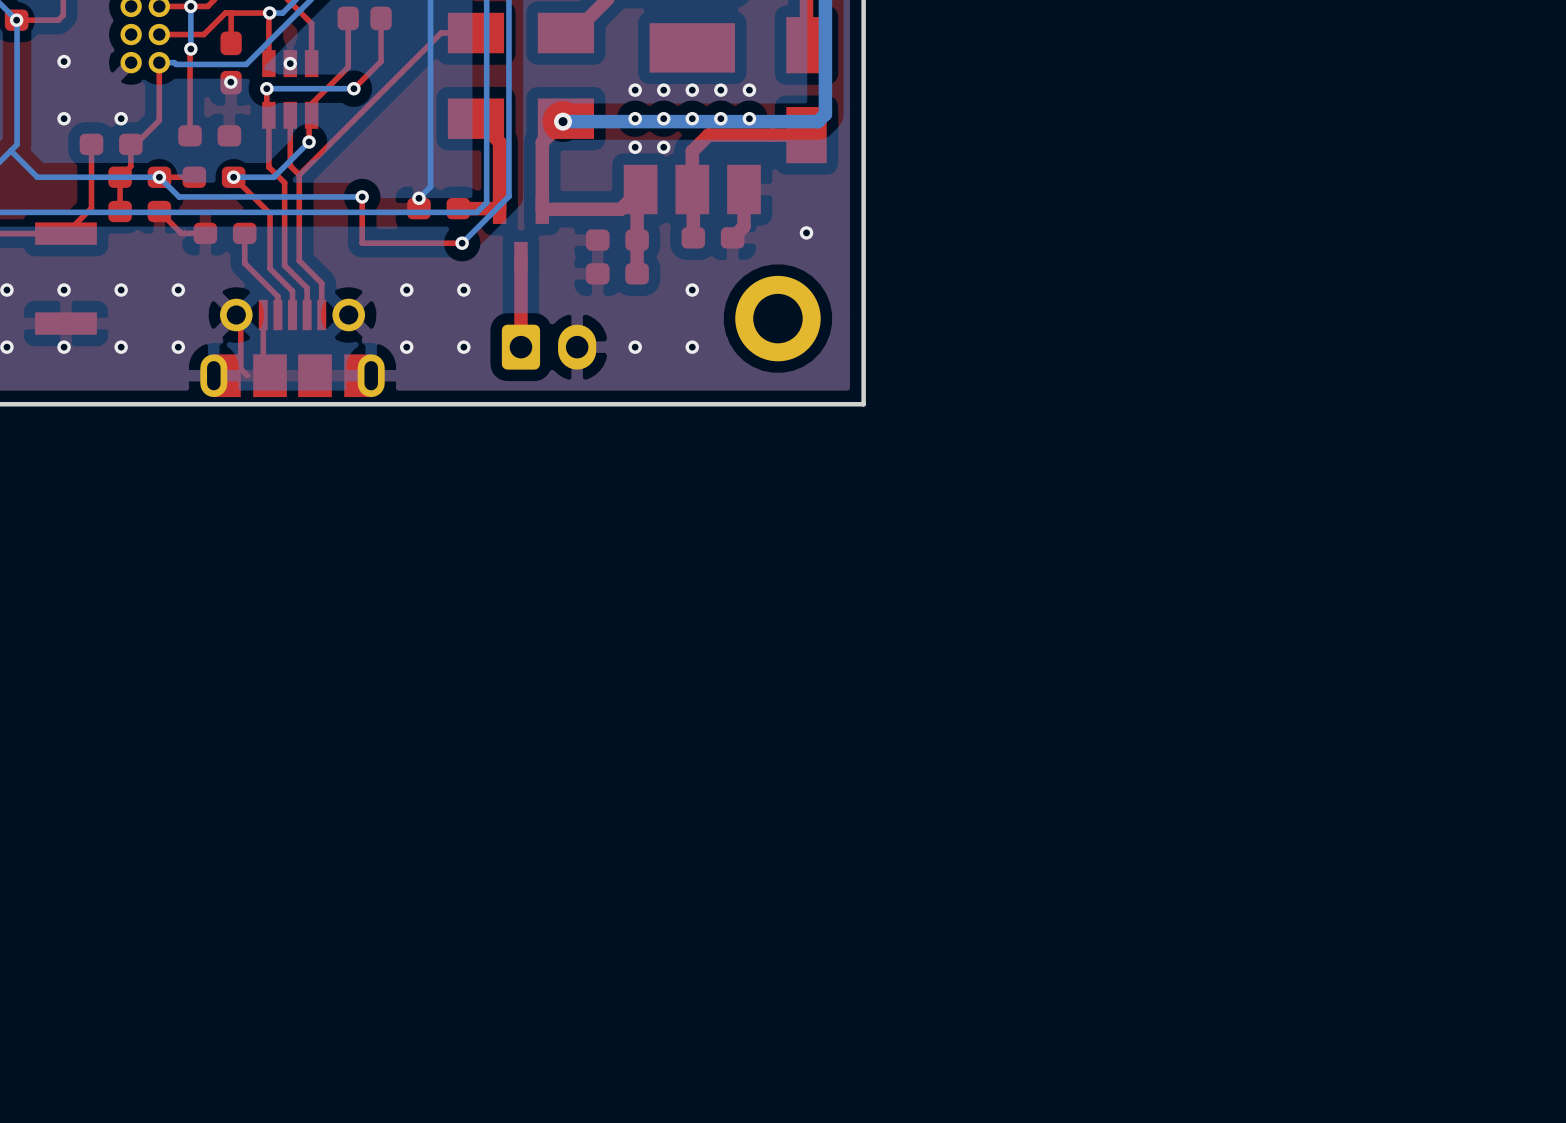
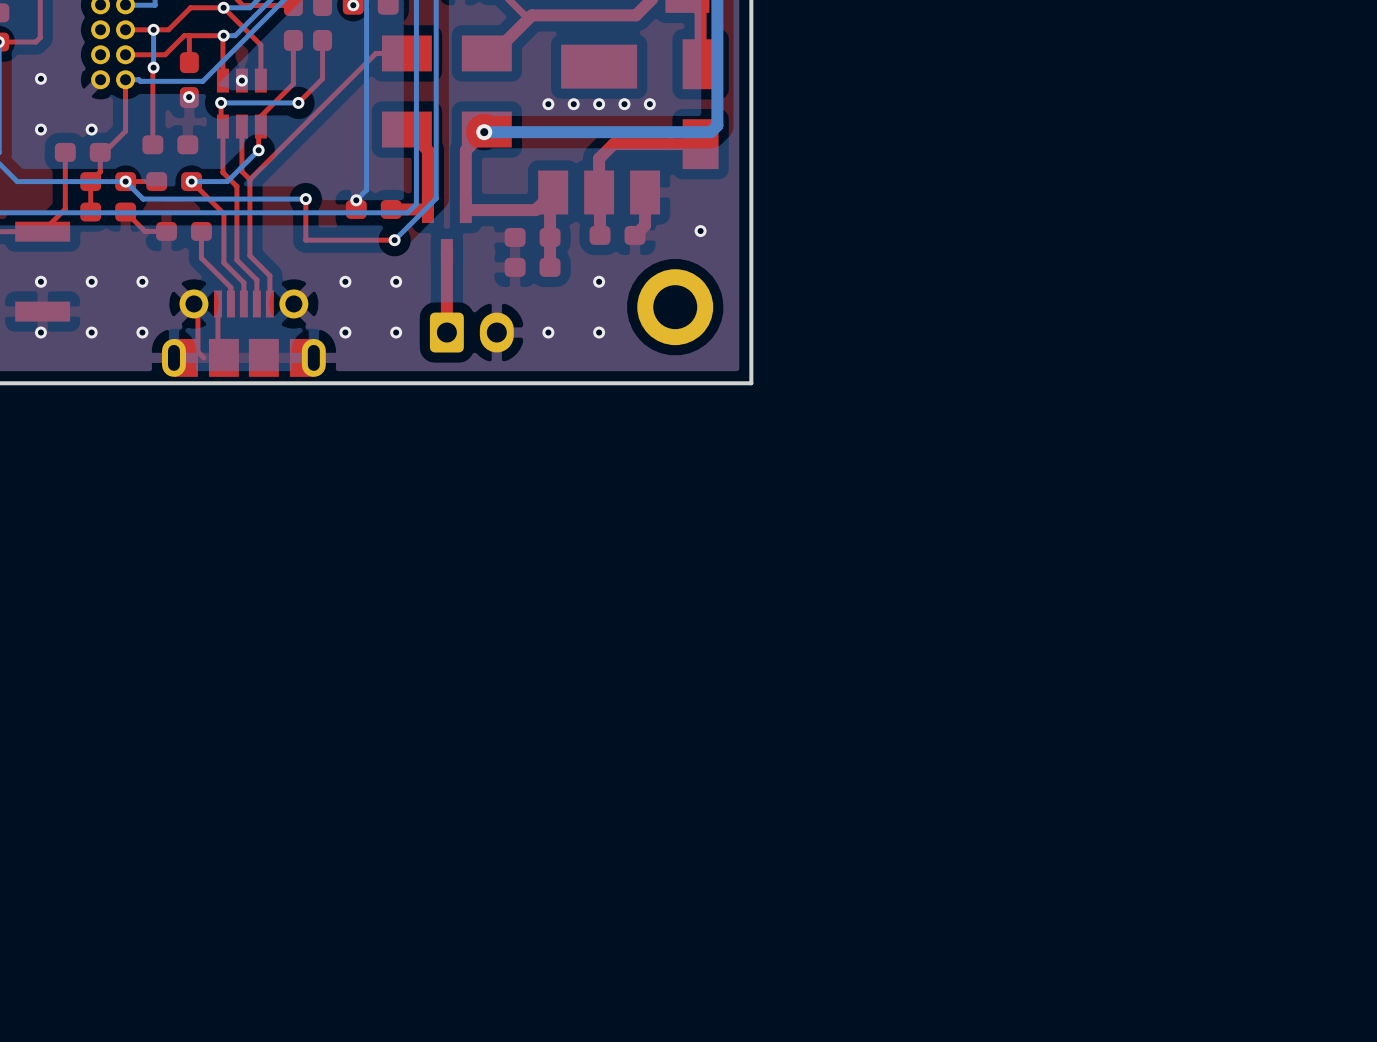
via: (635, 118) -> none
via: (663, 118) -> none
via: (692, 118) -> none
via: (720, 118) -> none
via: (749, 118) -> none
via: (635, 147) -> none
via: (663, 147) -> none

